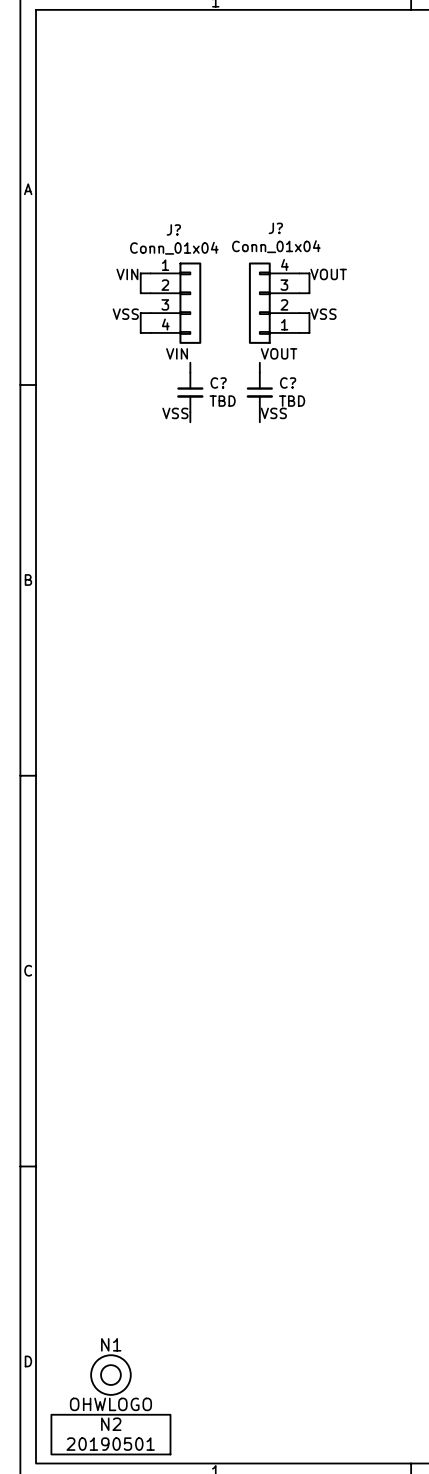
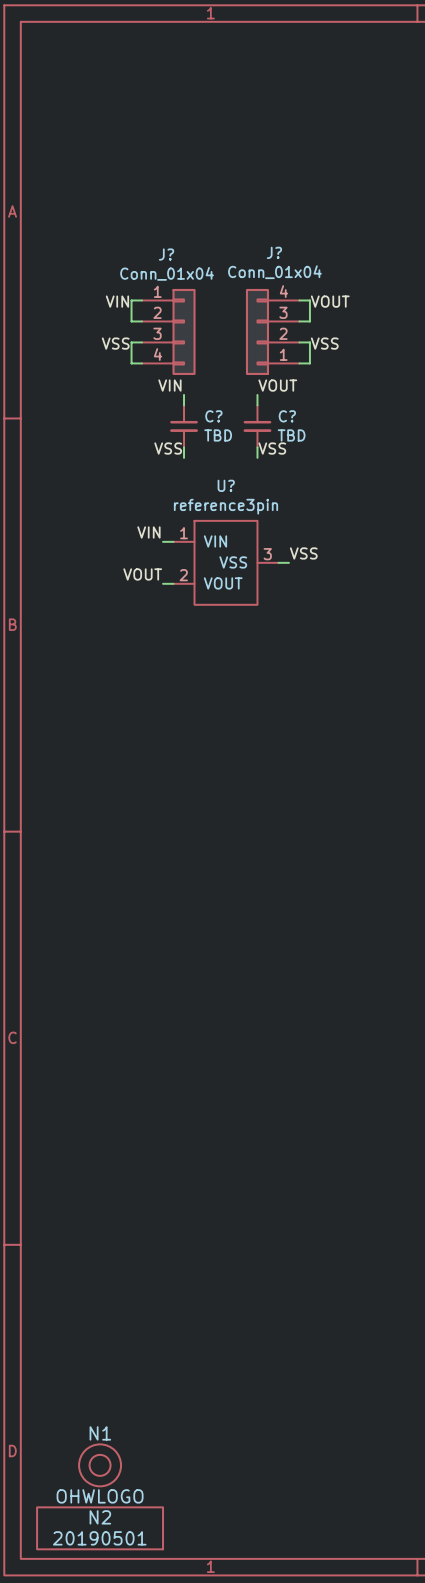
label: none -> VIN (148, 532)
wire: none -> (163, 541) (173, 541)
label: none -> VSS (303, 553)
U?: none -> reference3pin (225, 562)
wire: none -> (278, 562) (288, 562)
label: none -> VOUT (142, 574)
wire: none -> (163, 583) (173, 583)

